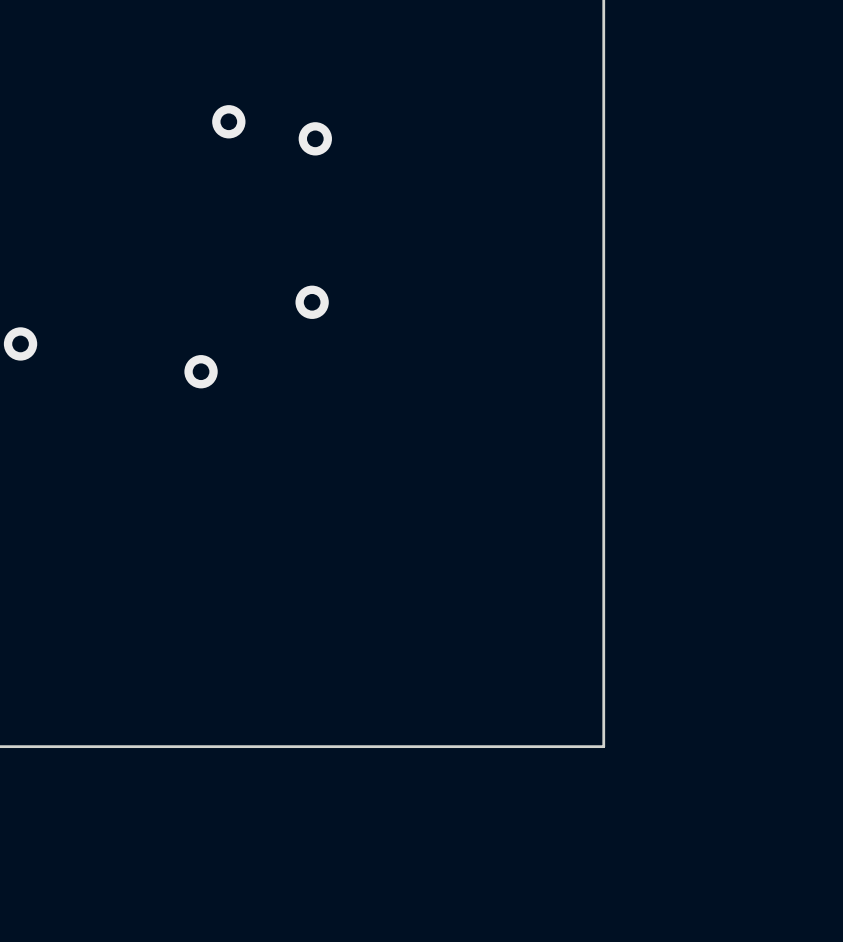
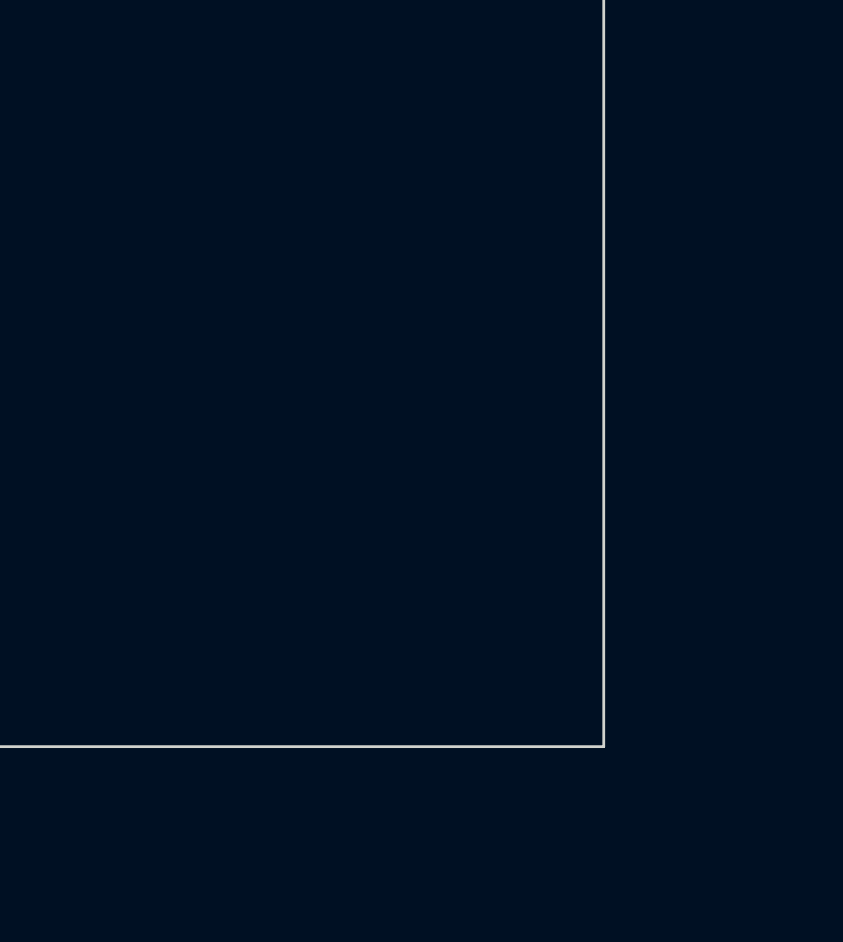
via: (228, 121) -> none
via: (315, 138) -> none
via: (312, 302) -> none
via: (20, 343) -> none
via: (201, 371) -> none

